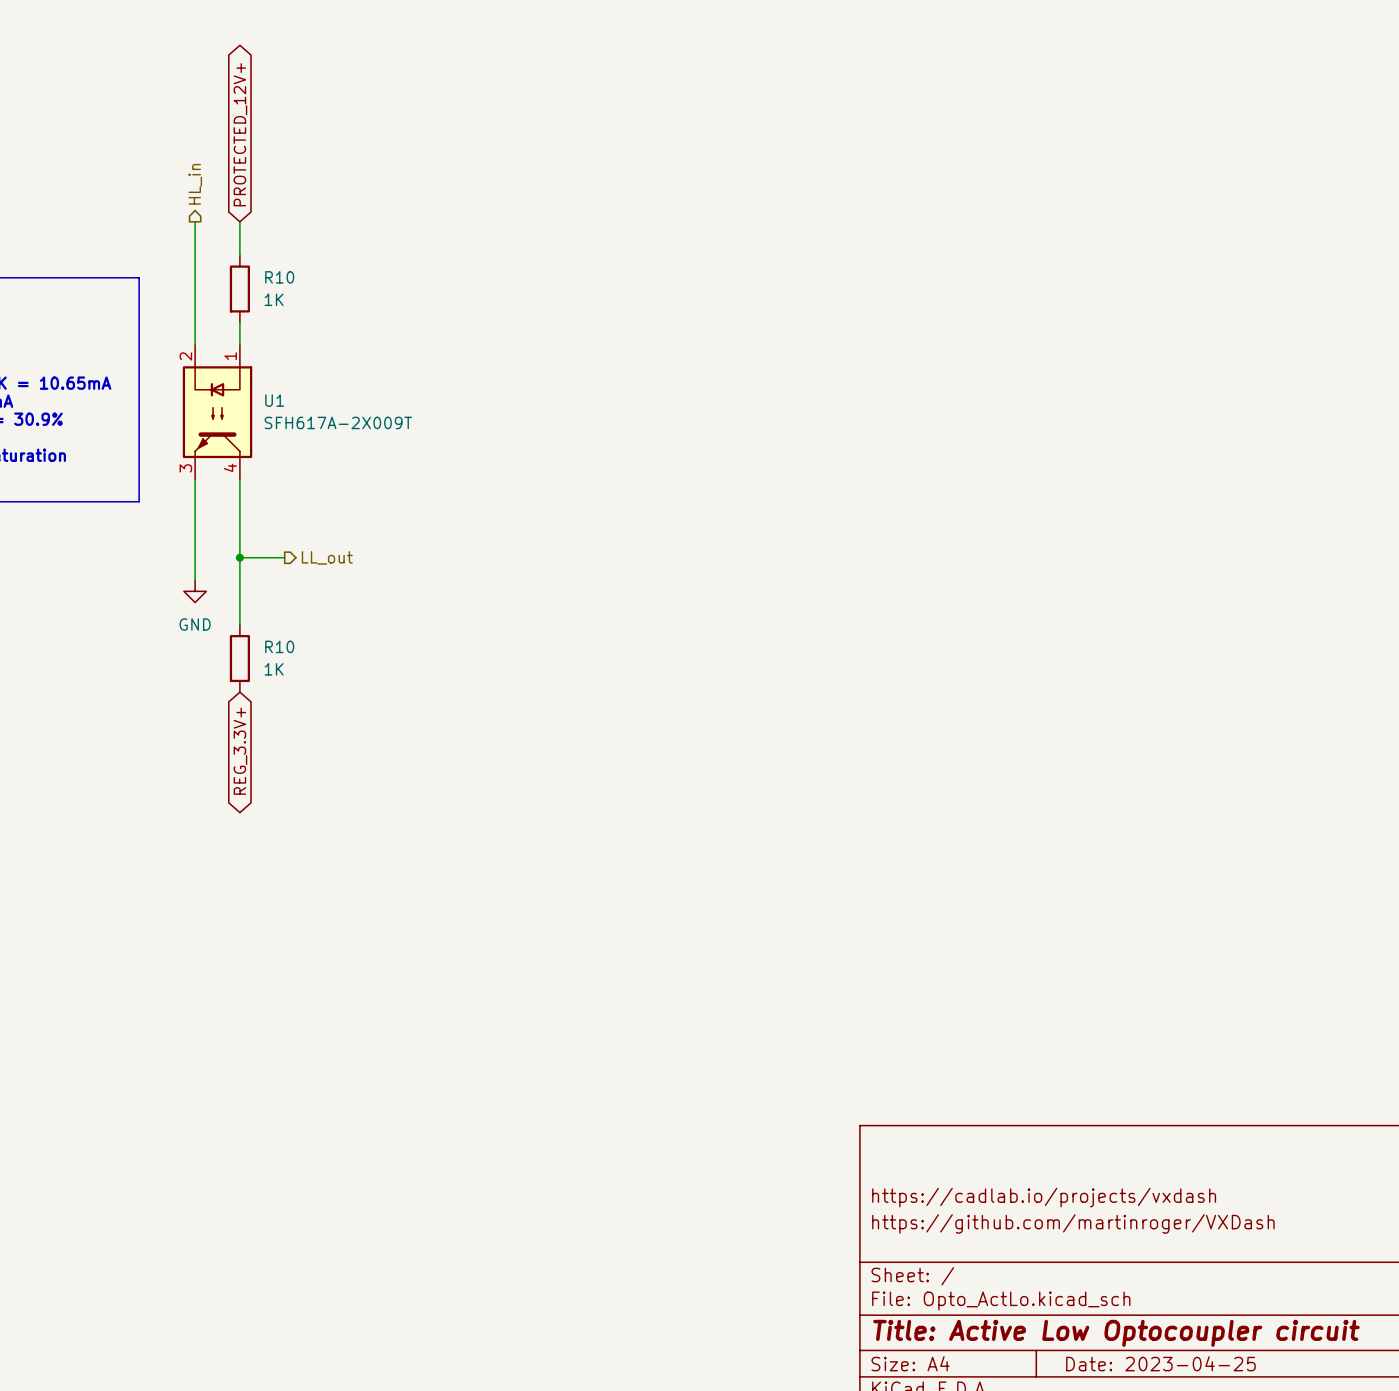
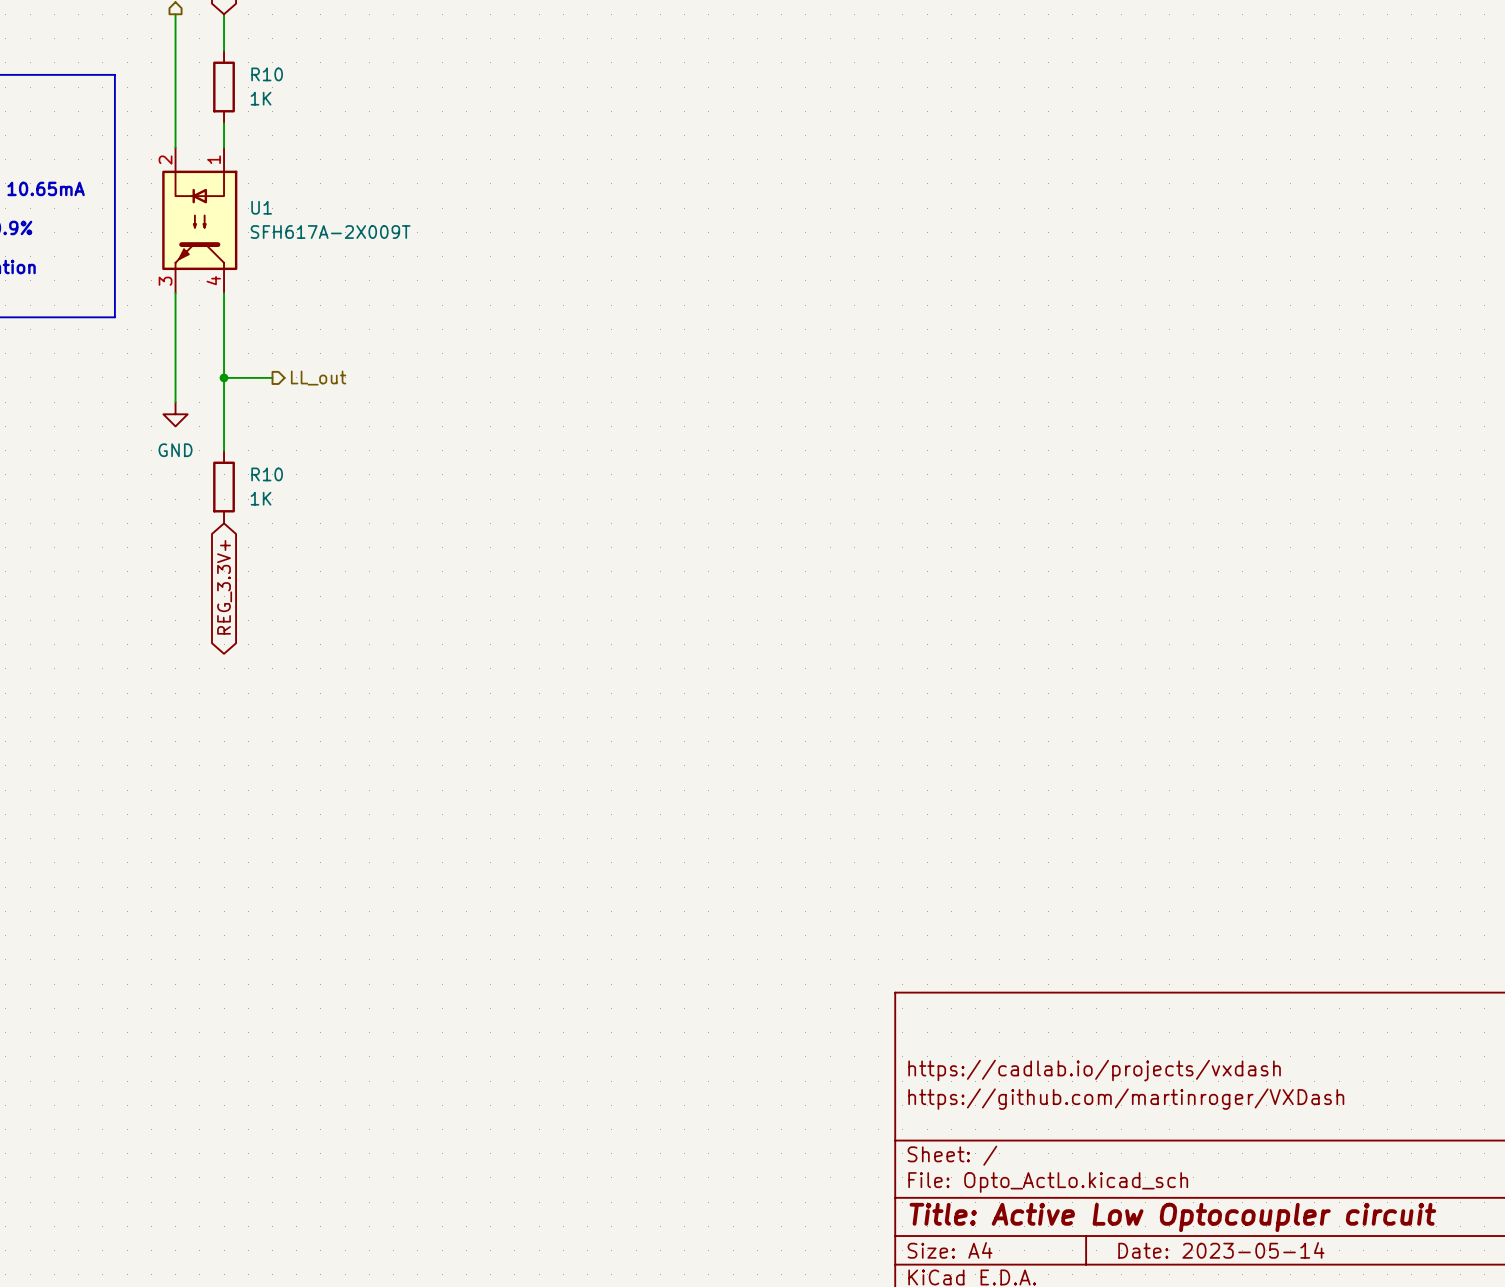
title block: Date: 2023-04-25 (1160, 1363) -> Date: 2023-05-14 (1221, 1250)

